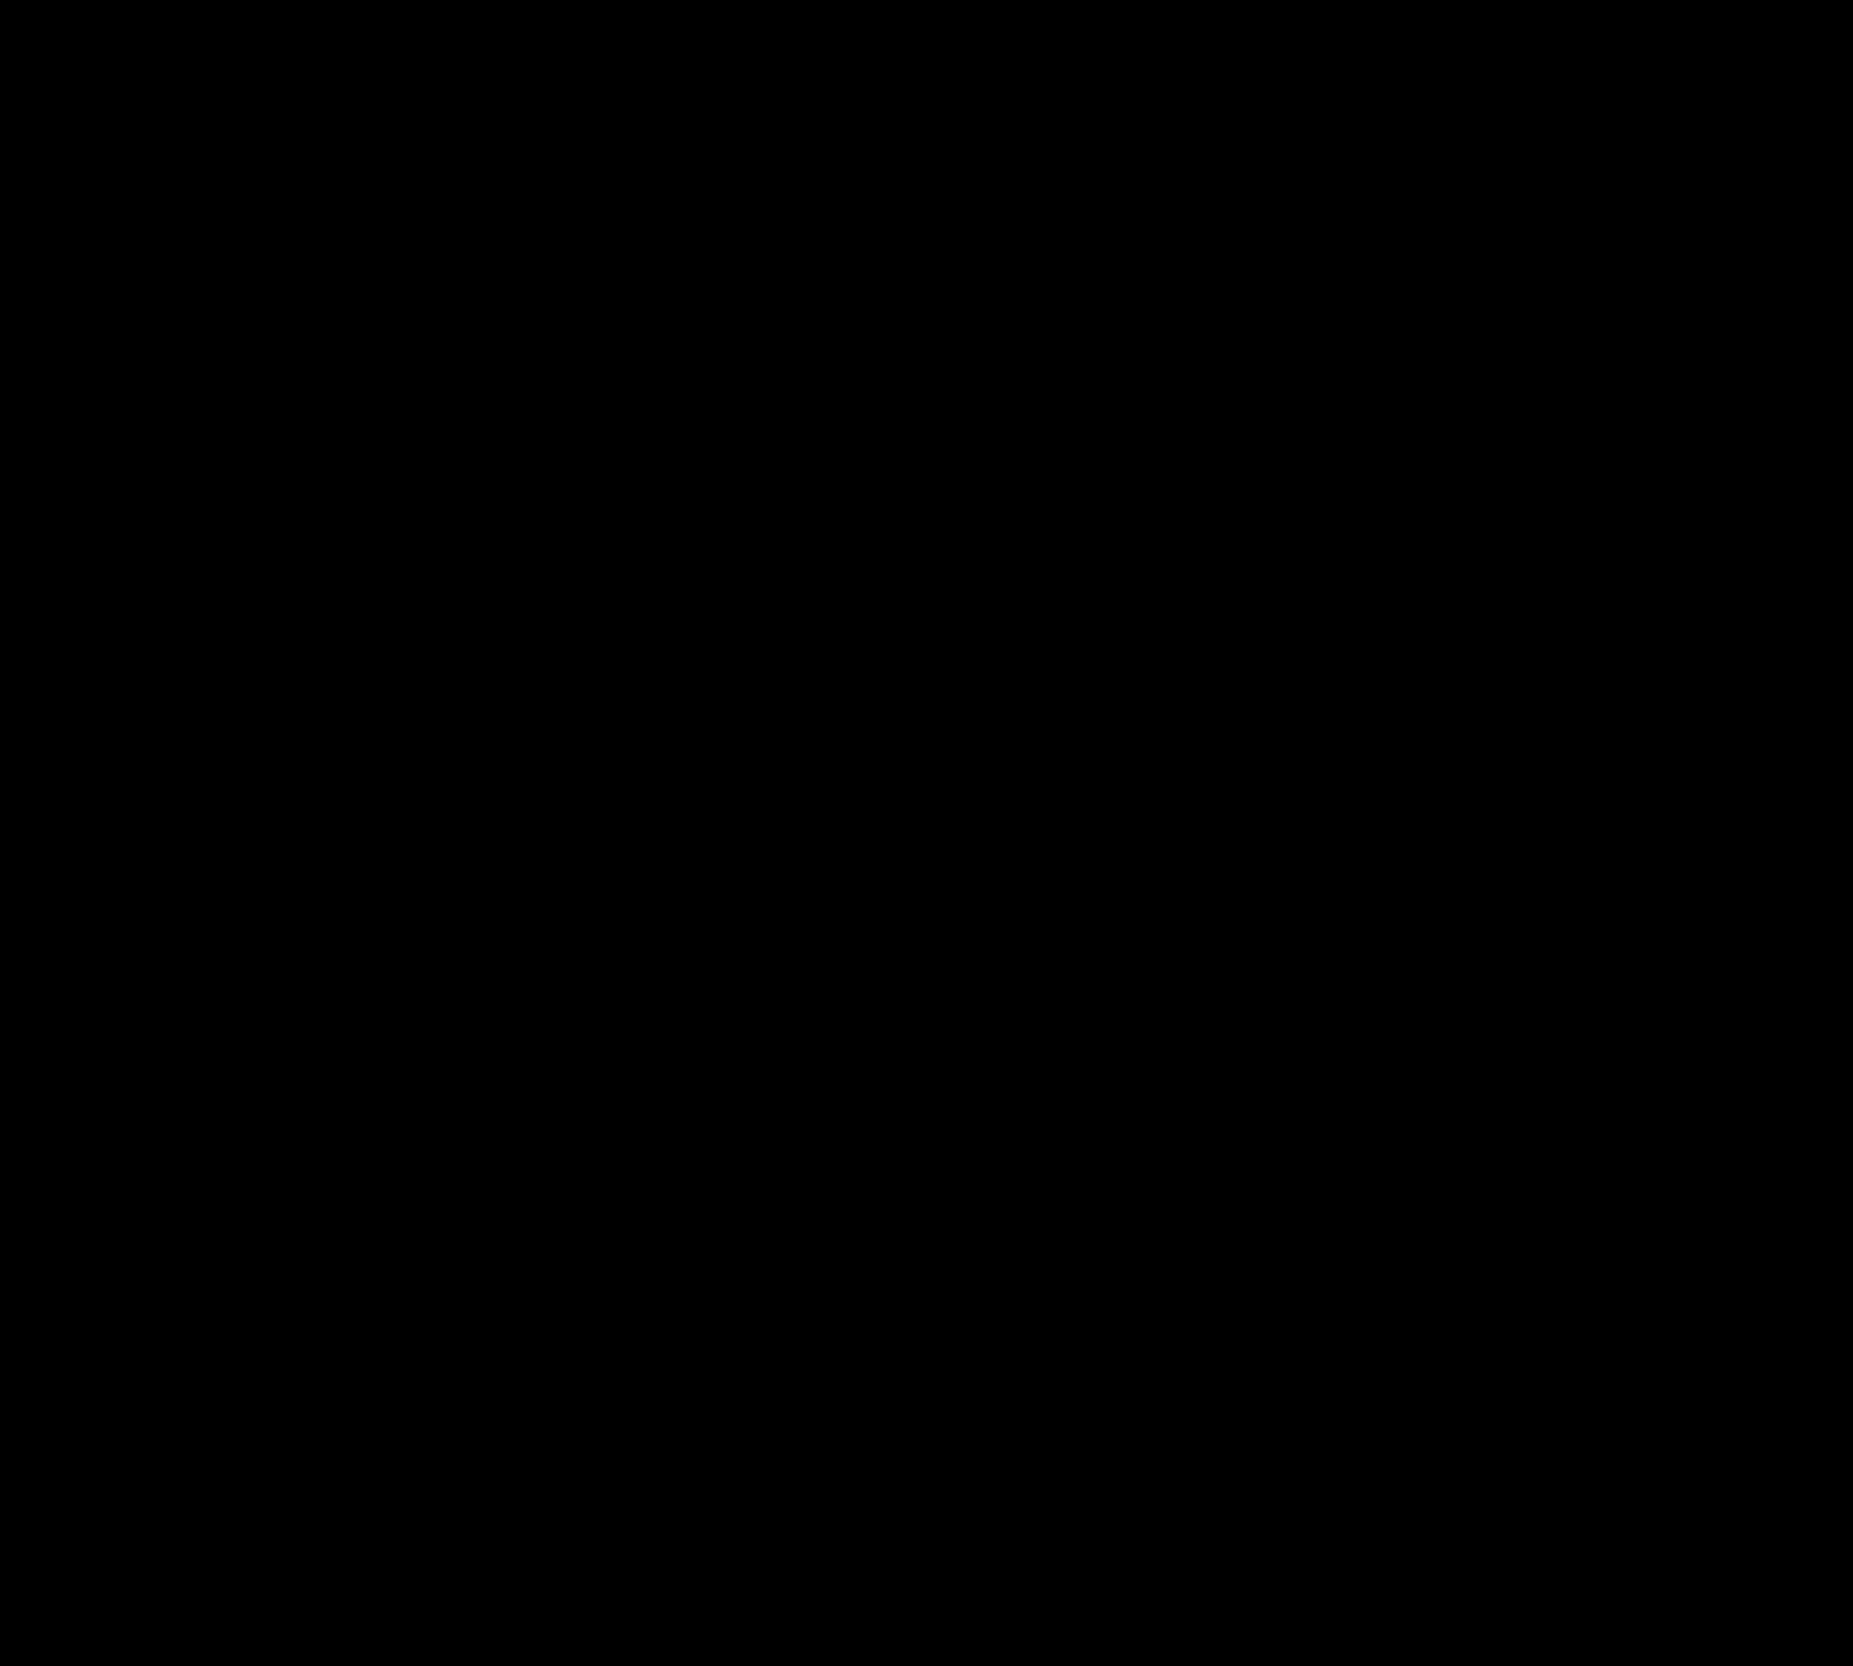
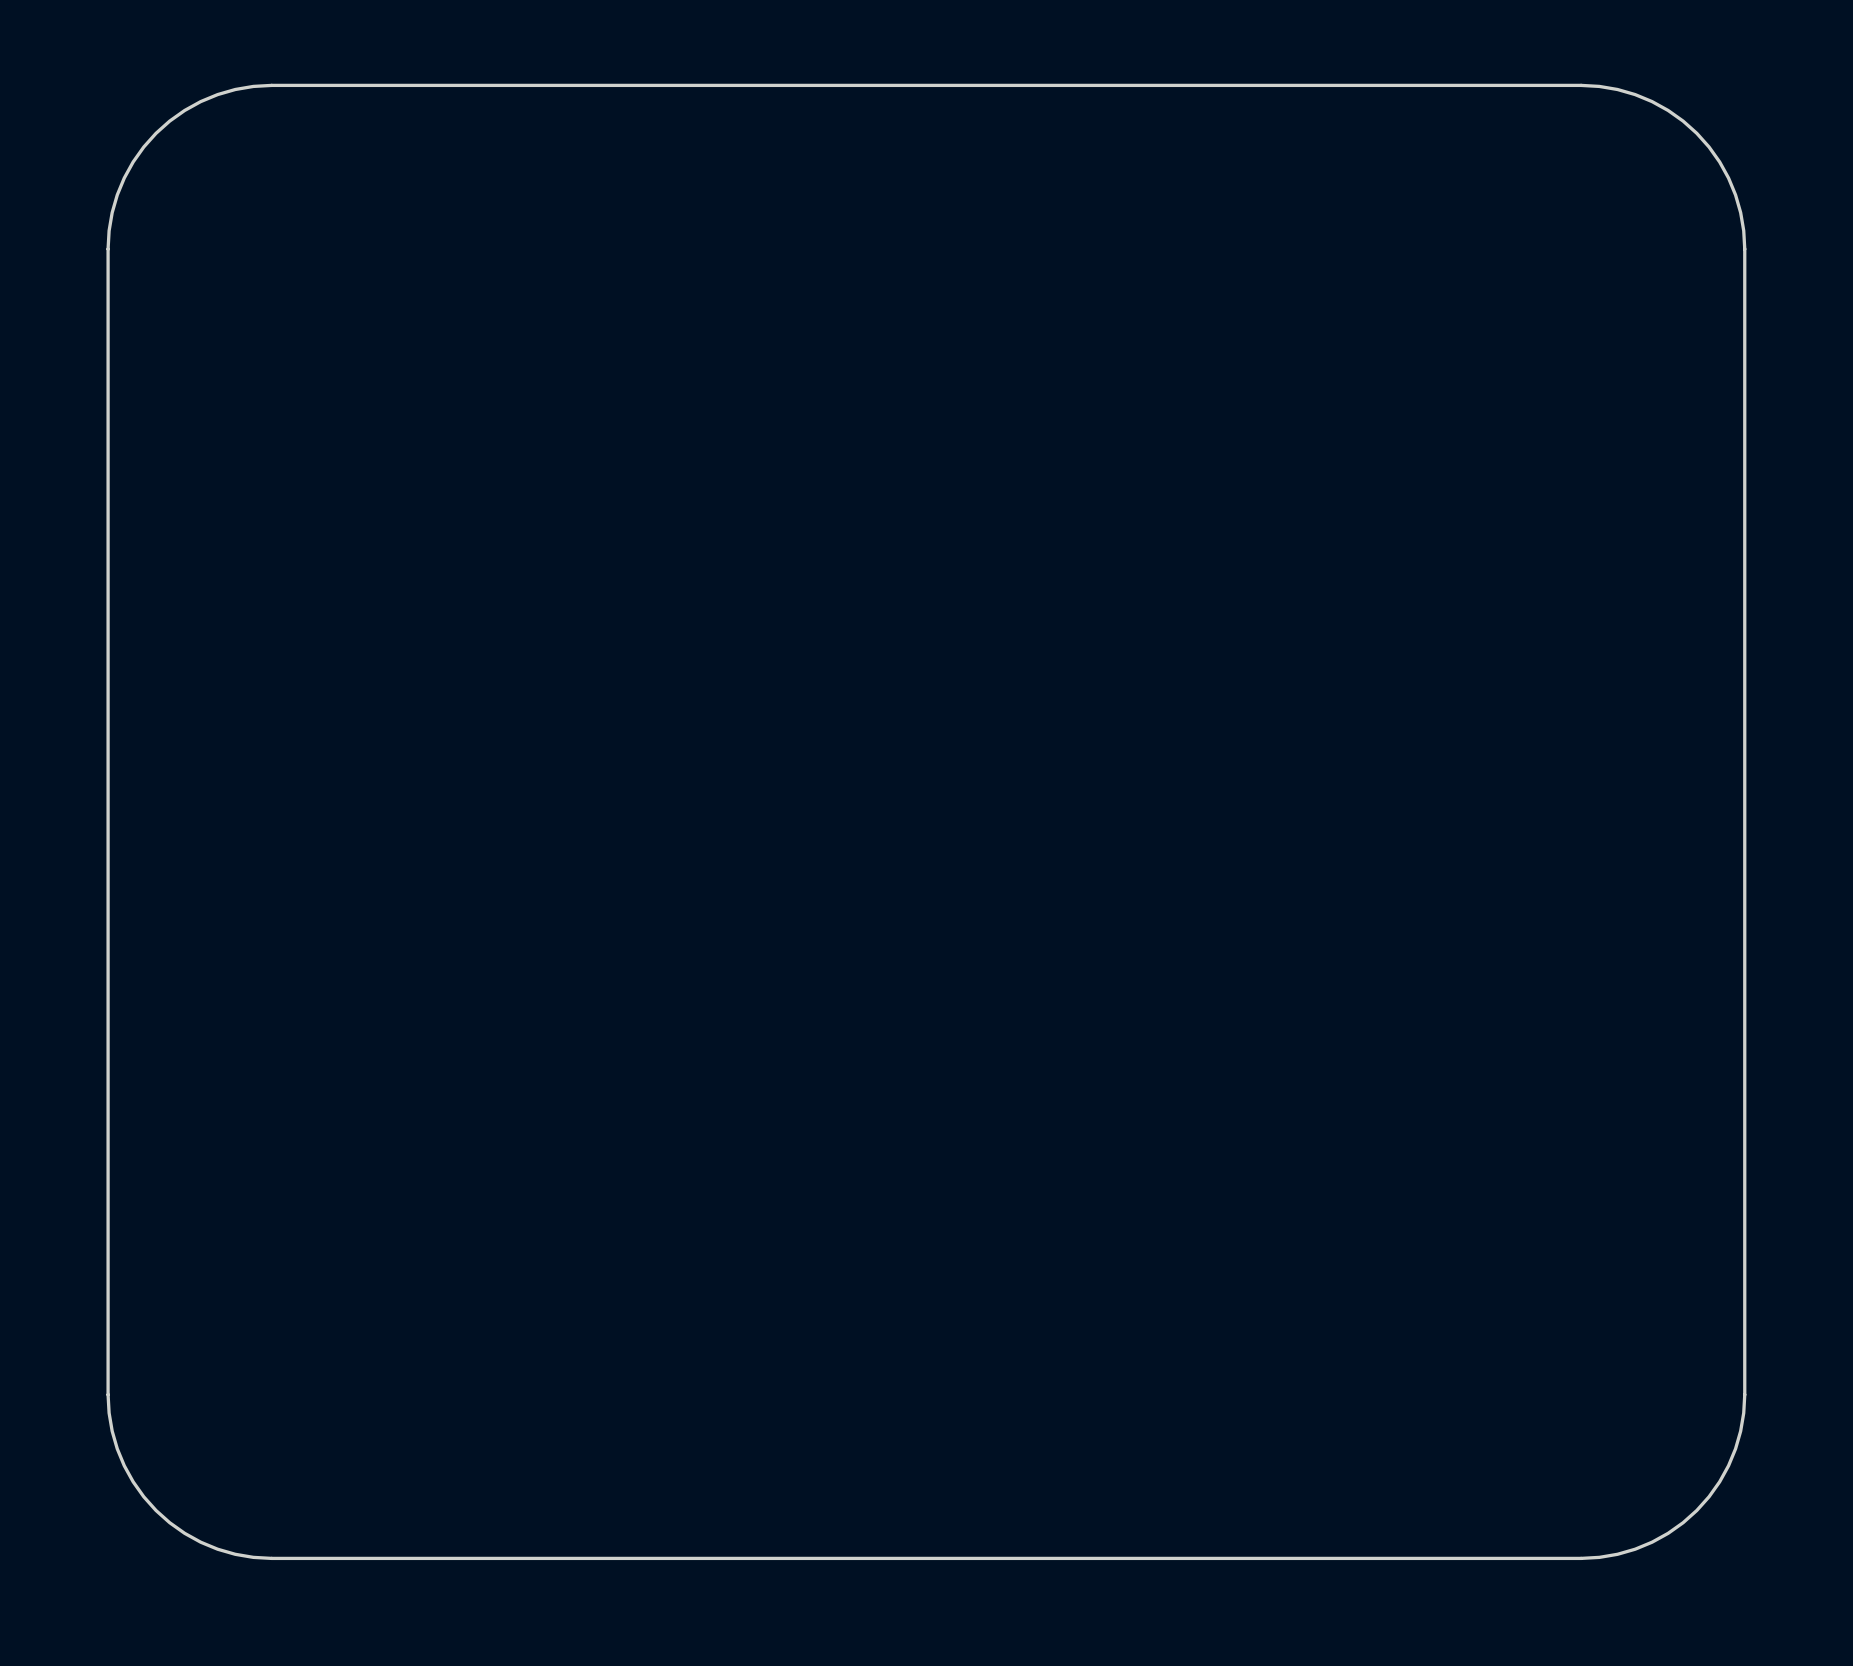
board edge: none -> (1581, 85) (271, 85) (235, 89) (200, 101) (169, 121) (156, 133) (133, 161) (117, 195) (109, 230) (108, 249) (108, 1394) (109, 1413) (117, 1448) (133, 1481) (156, 1510) (184, 1533) (217, 1549) (253, 1557) (271, 1558) (1581, 1558) (1599, 1557) (1635, 1549) (1668, 1533) (1696, 1510) (1709, 1496) (1728, 1465) (1740, 1431) (1744, 1394) (1743, 230) (1740, 212) (1728, 178) (1709, 147) (1696, 133) (1668, 110) (1652, 101) (1617, 89) (1581, 85)

